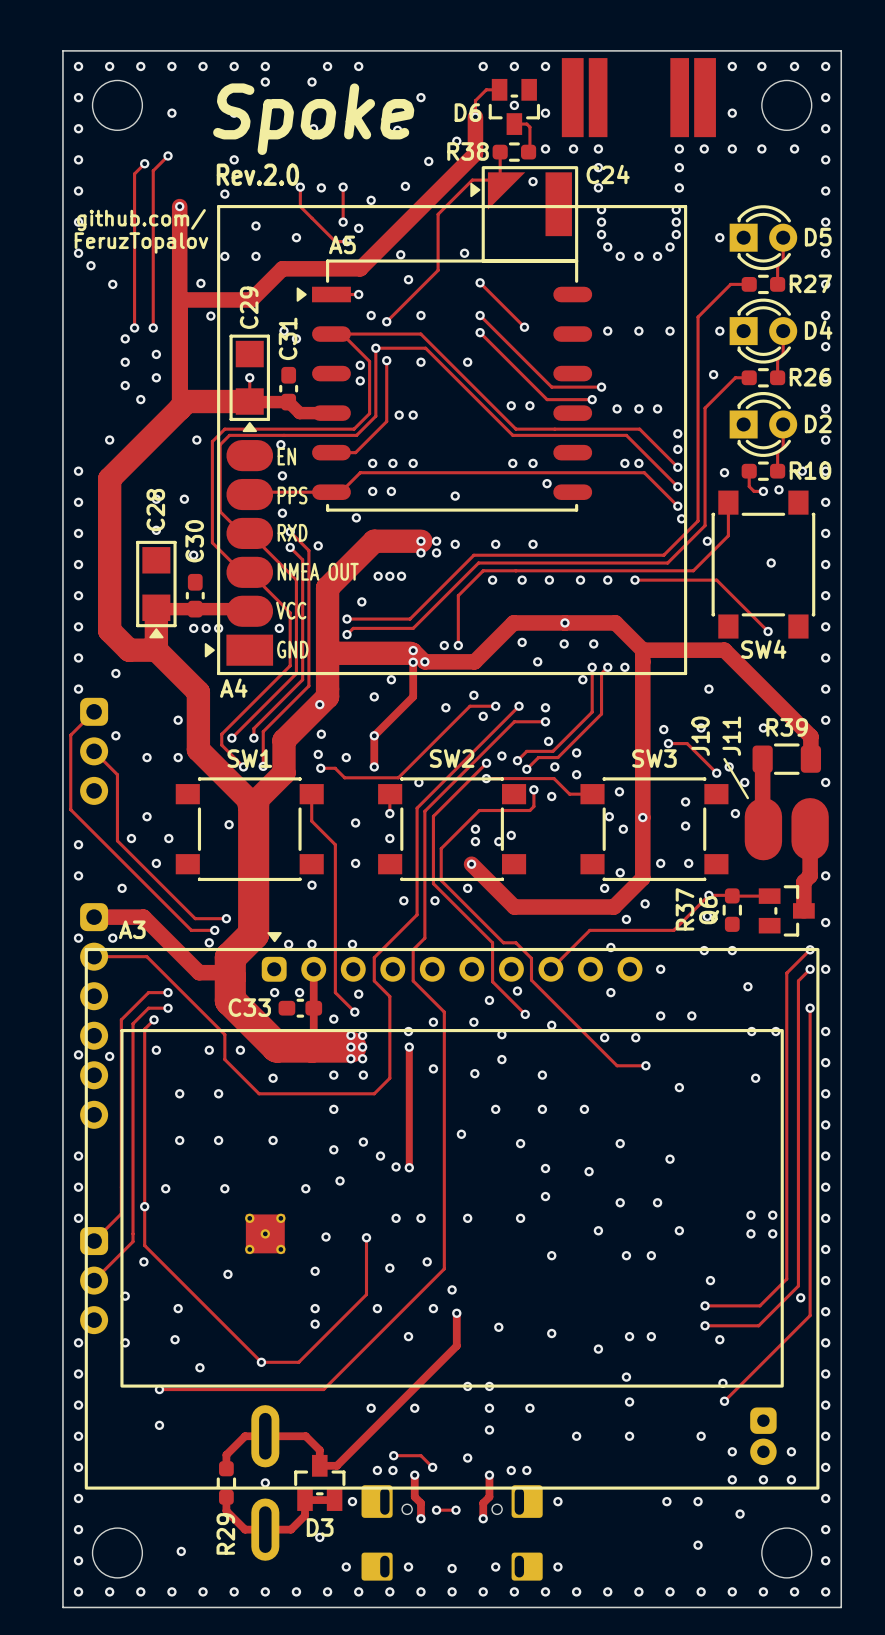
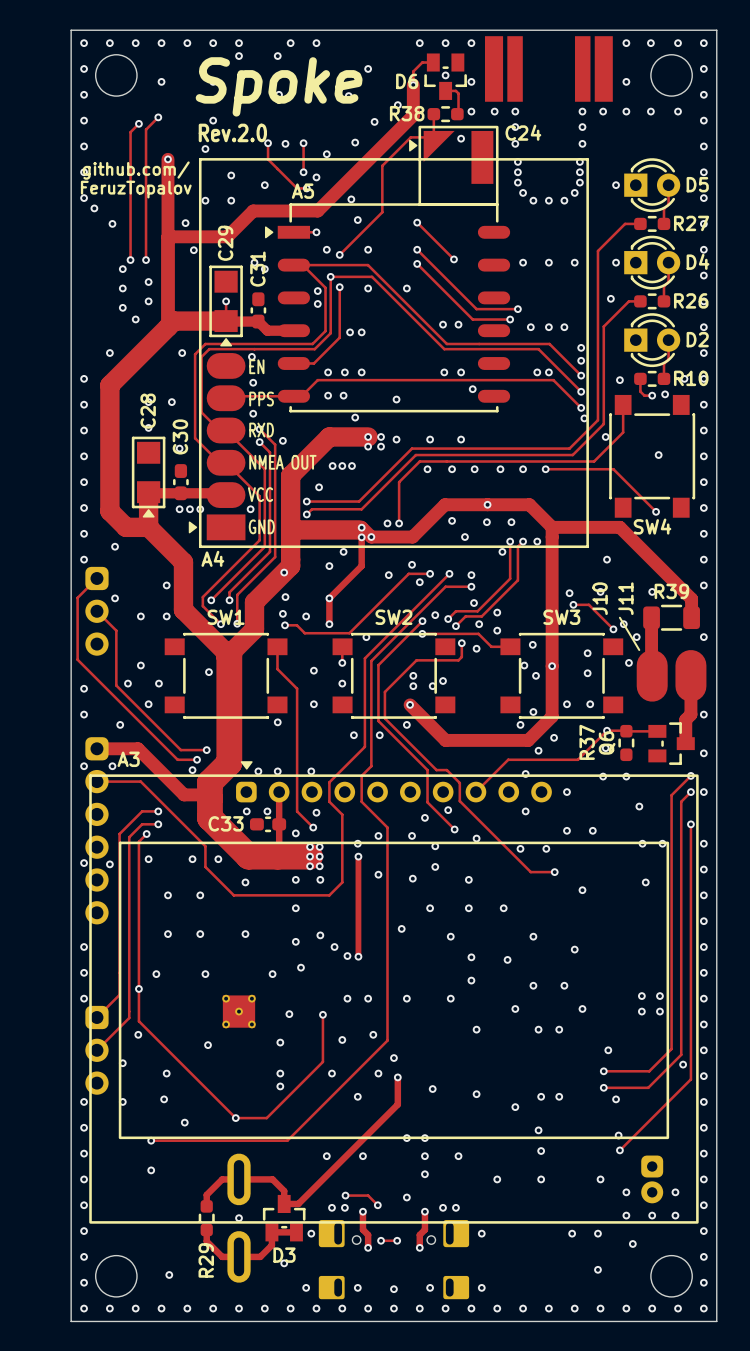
via: (464, 253) -> none
via position: (356, 517) -> (355, 417)

